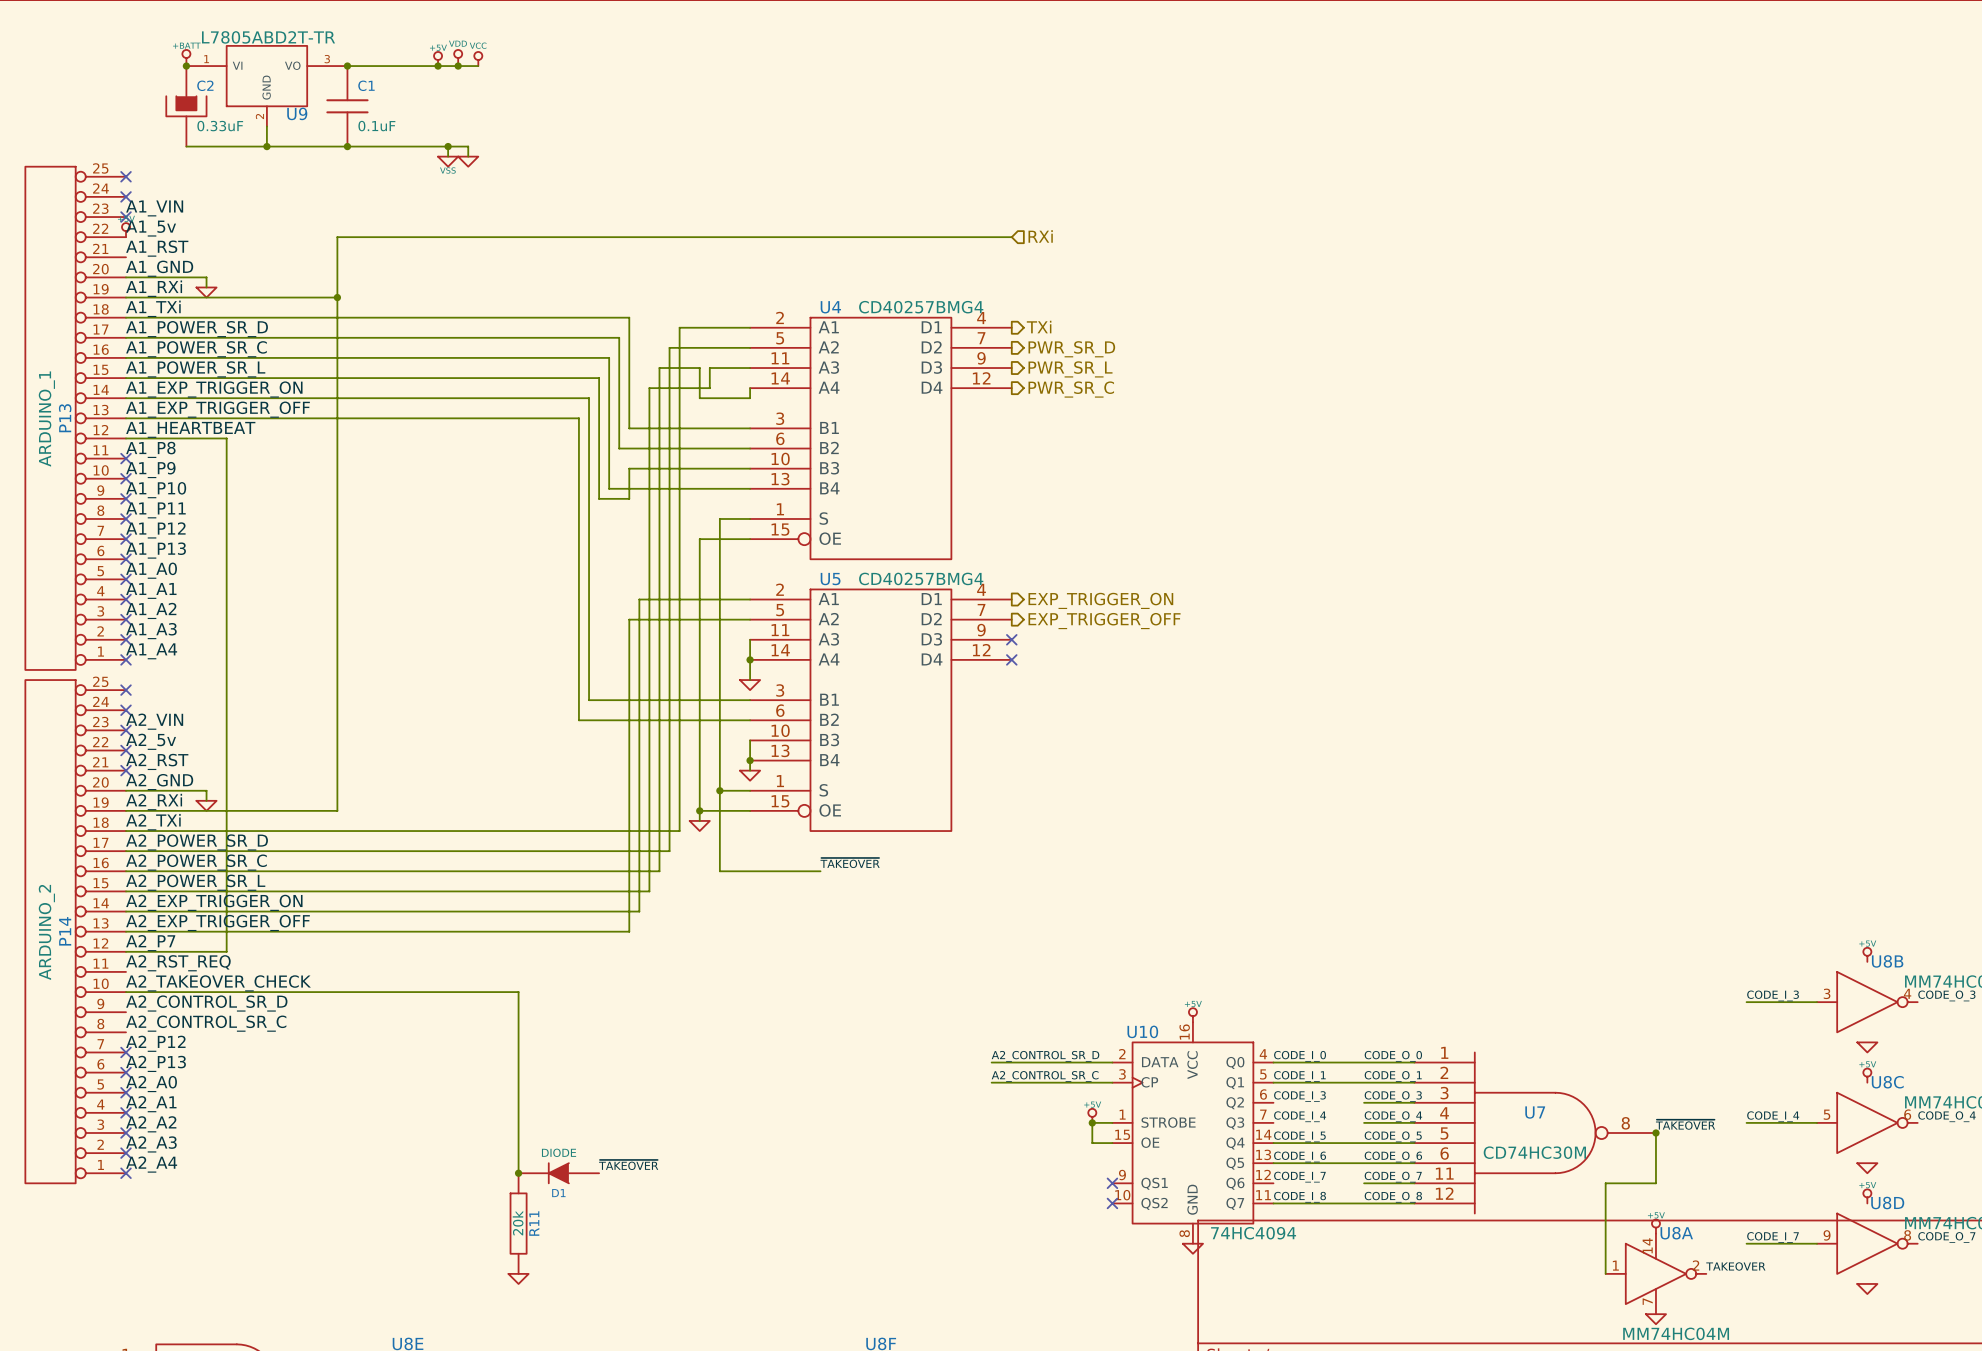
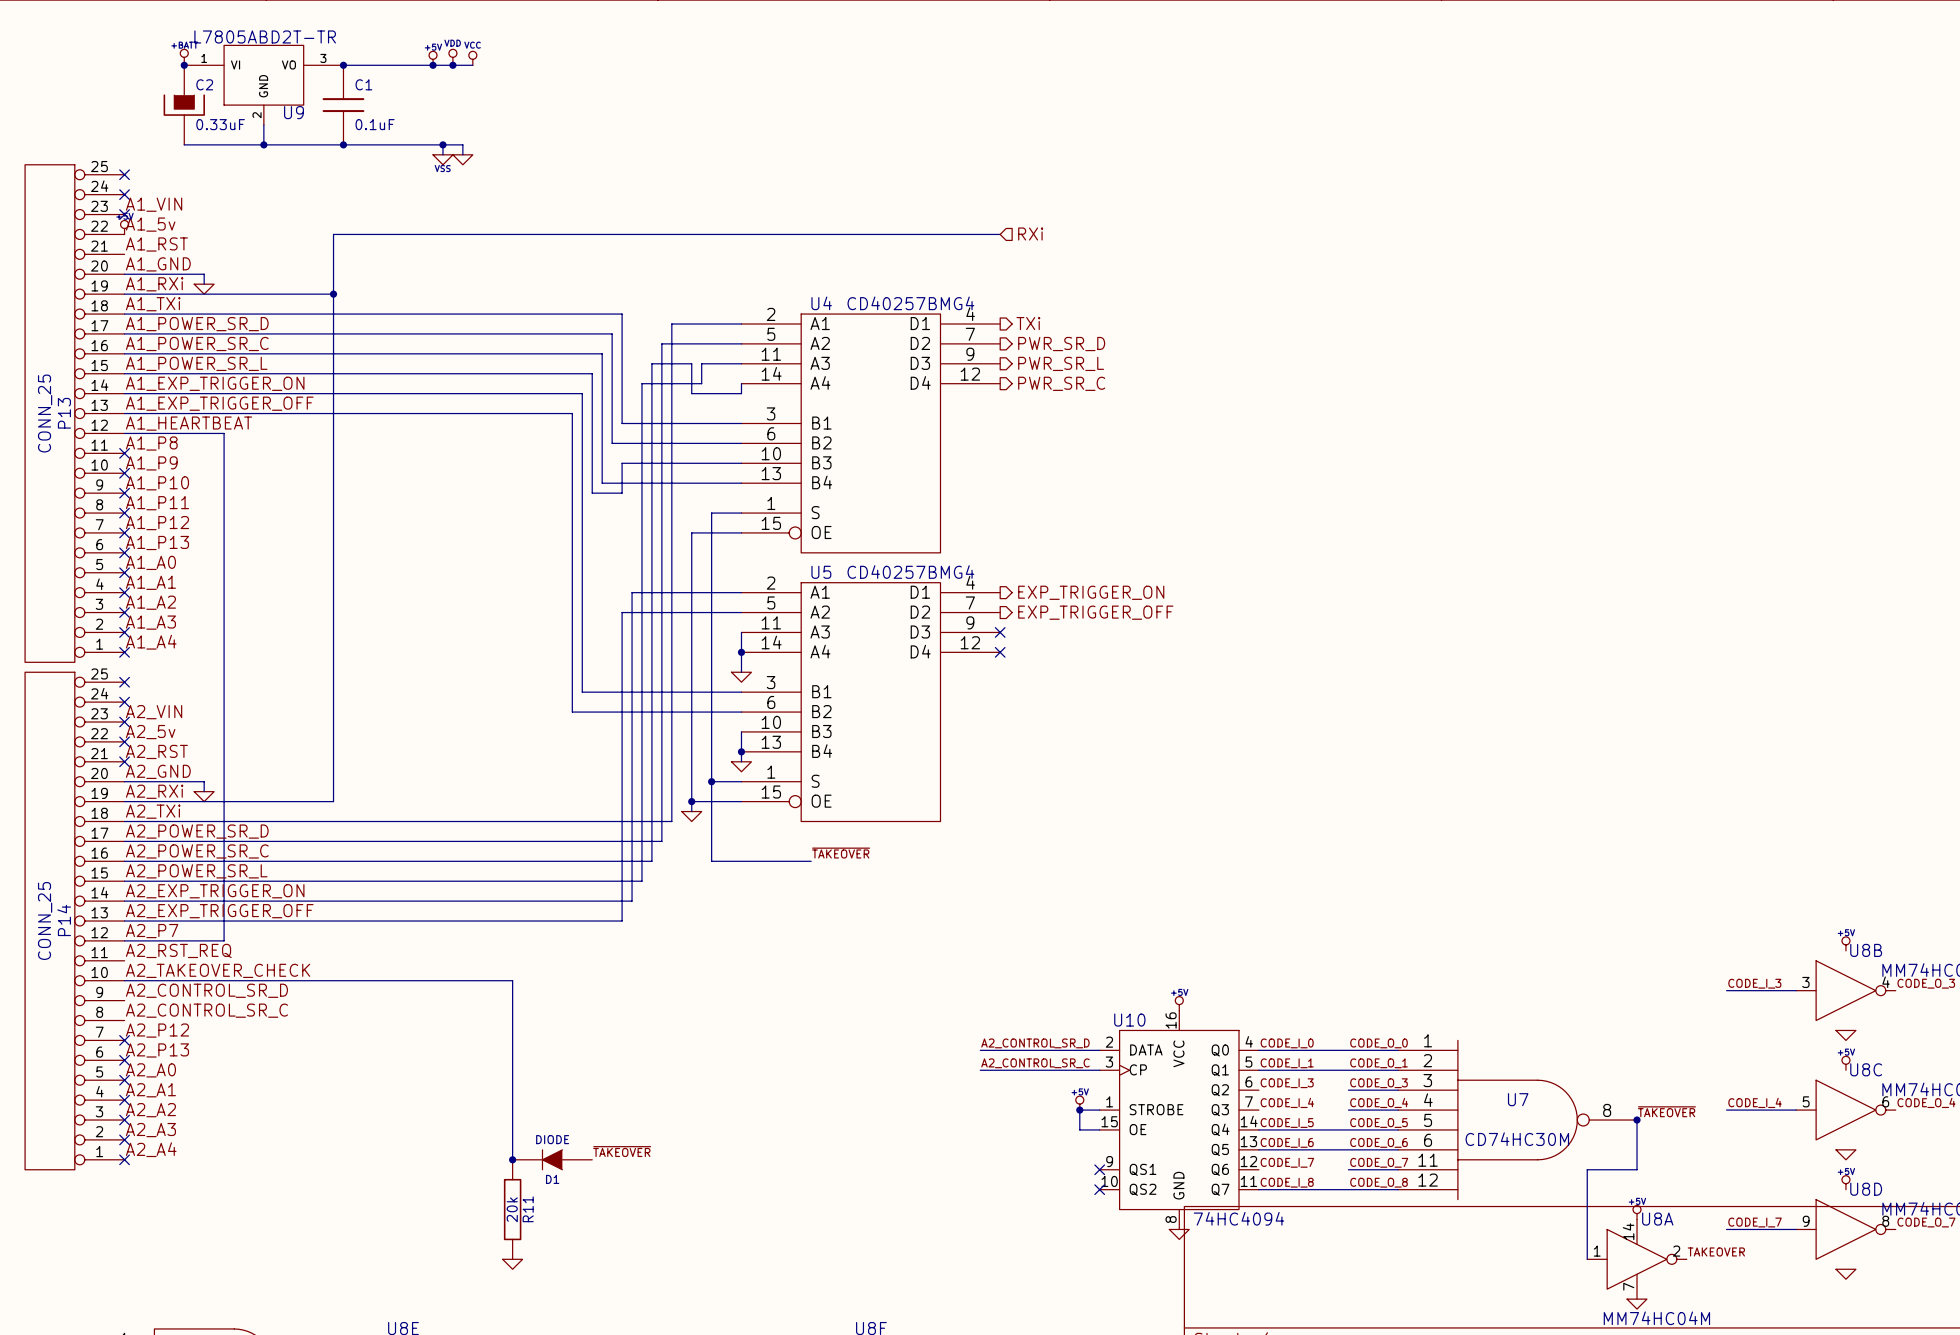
P13 value: ARDUINO_1 (46, 419) -> CONN_25 (45, 413)
P14 value: ARDUINO_2 (46, 932) -> CONN_25 (45, 921)

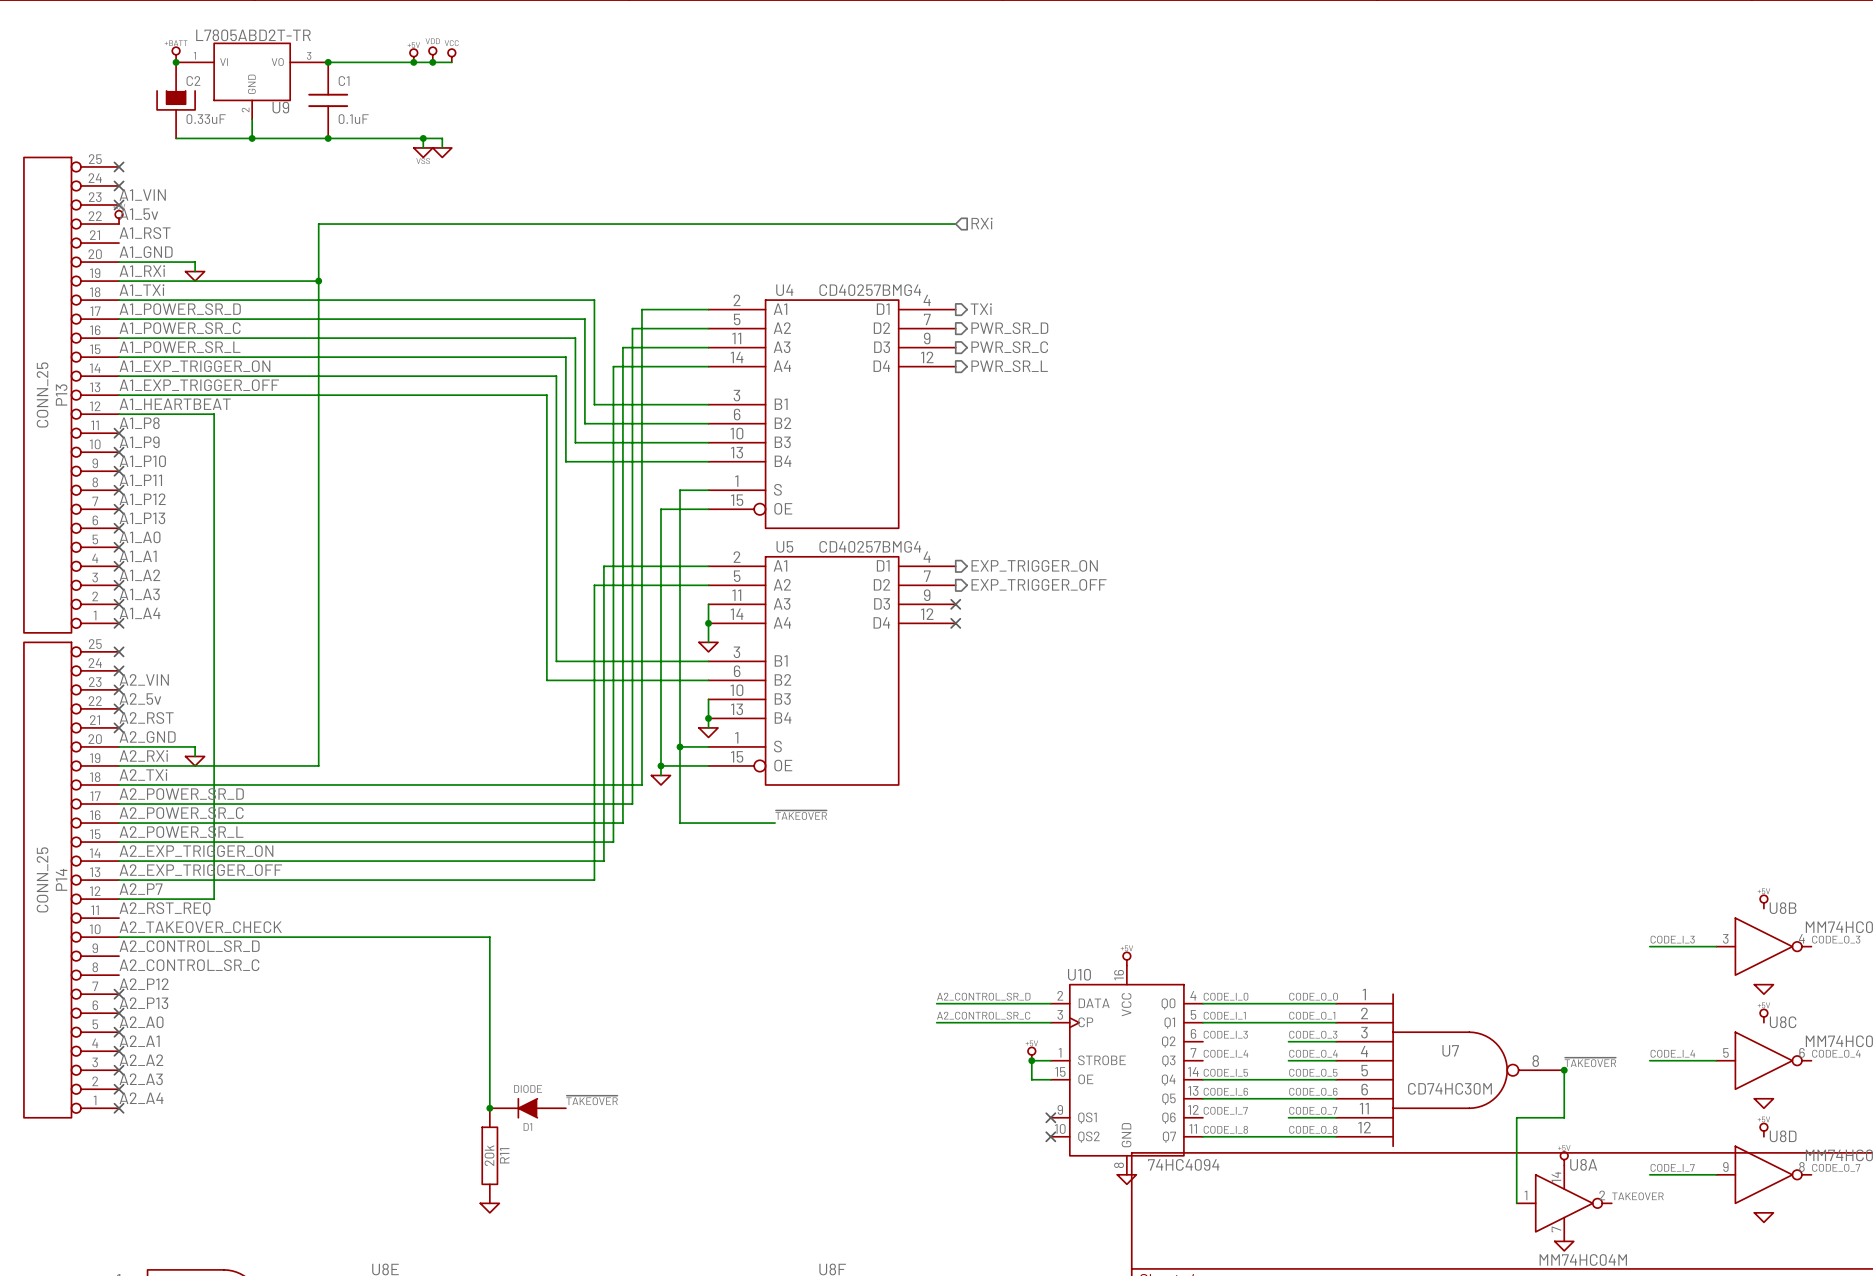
wire: (691, 363) (691, 393) (741, 393) (741, 383) -> (670, 366) (708, 366)
wire: (701, 363) (701, 383) -> (670, 347) (660, 347)
hierarchical label: PWR_SR_L (1061, 363) -> PWR_SR_C (1009, 347)
hierarchical label: PWR_SR_C (1061, 383) -> PWR_SR_L (1009, 366)
wire: (602, 463) (602, 483) -> (565, 461) (575, 461)
wire: (622, 463) (622, 493) (592, 493) (592, 483) -> (594, 442) (575, 442)

